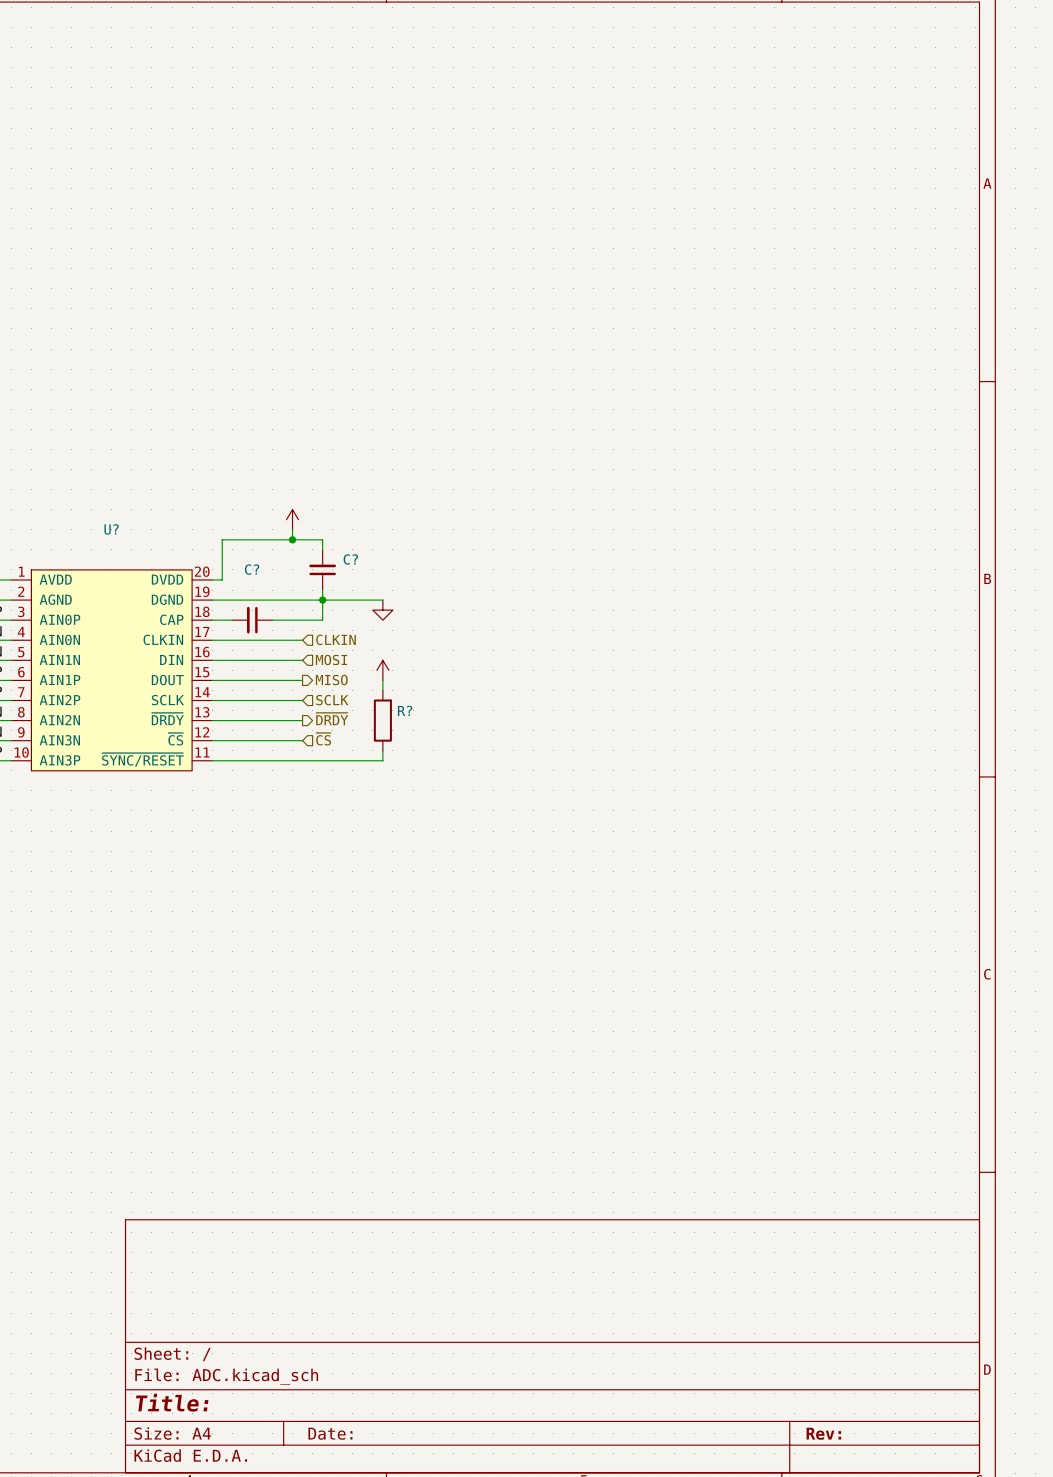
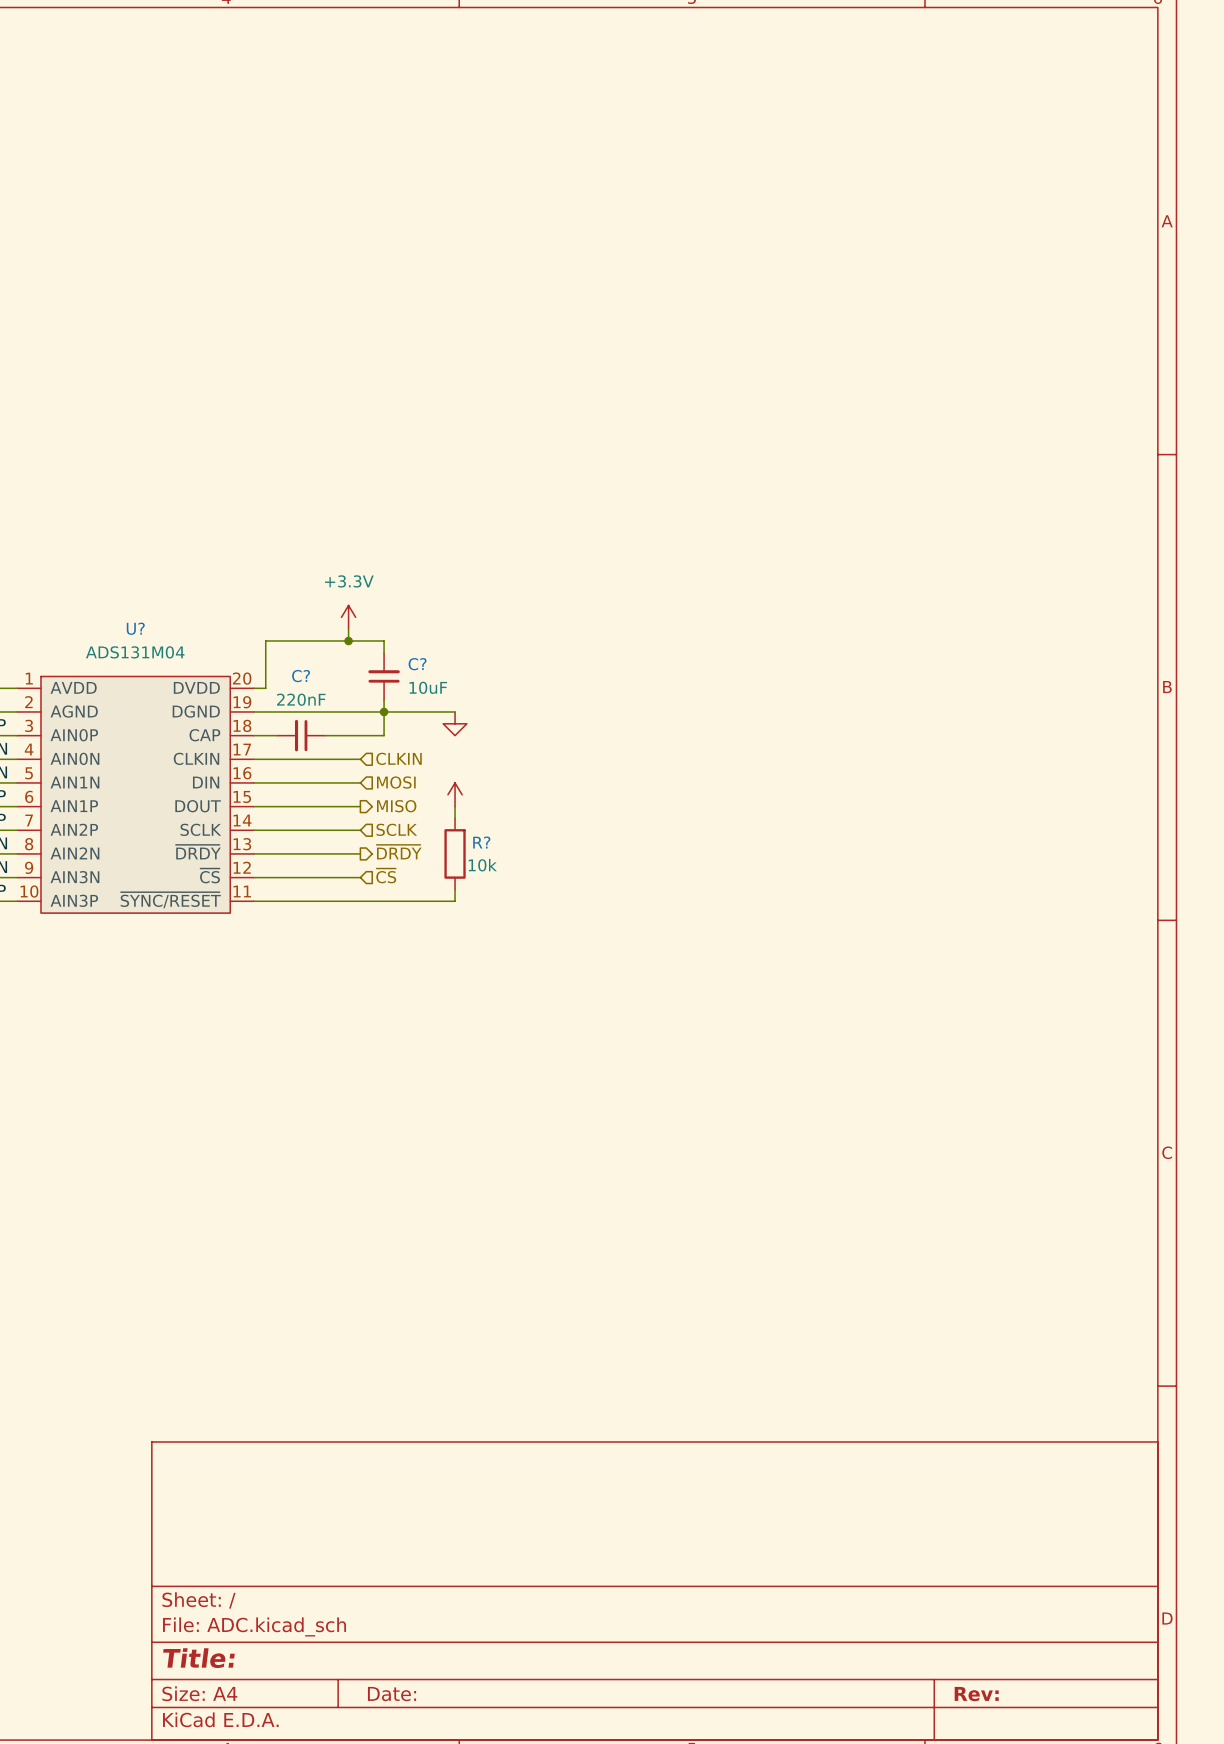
power symbol text: none -> +3.3V (349, 581)
U? value: none -> ADS131M04 (135, 652)
C? value: none -> 10uF (428, 687)
C? value: none -> 220nF (301, 699)
R? value: none -> 10k (482, 865)

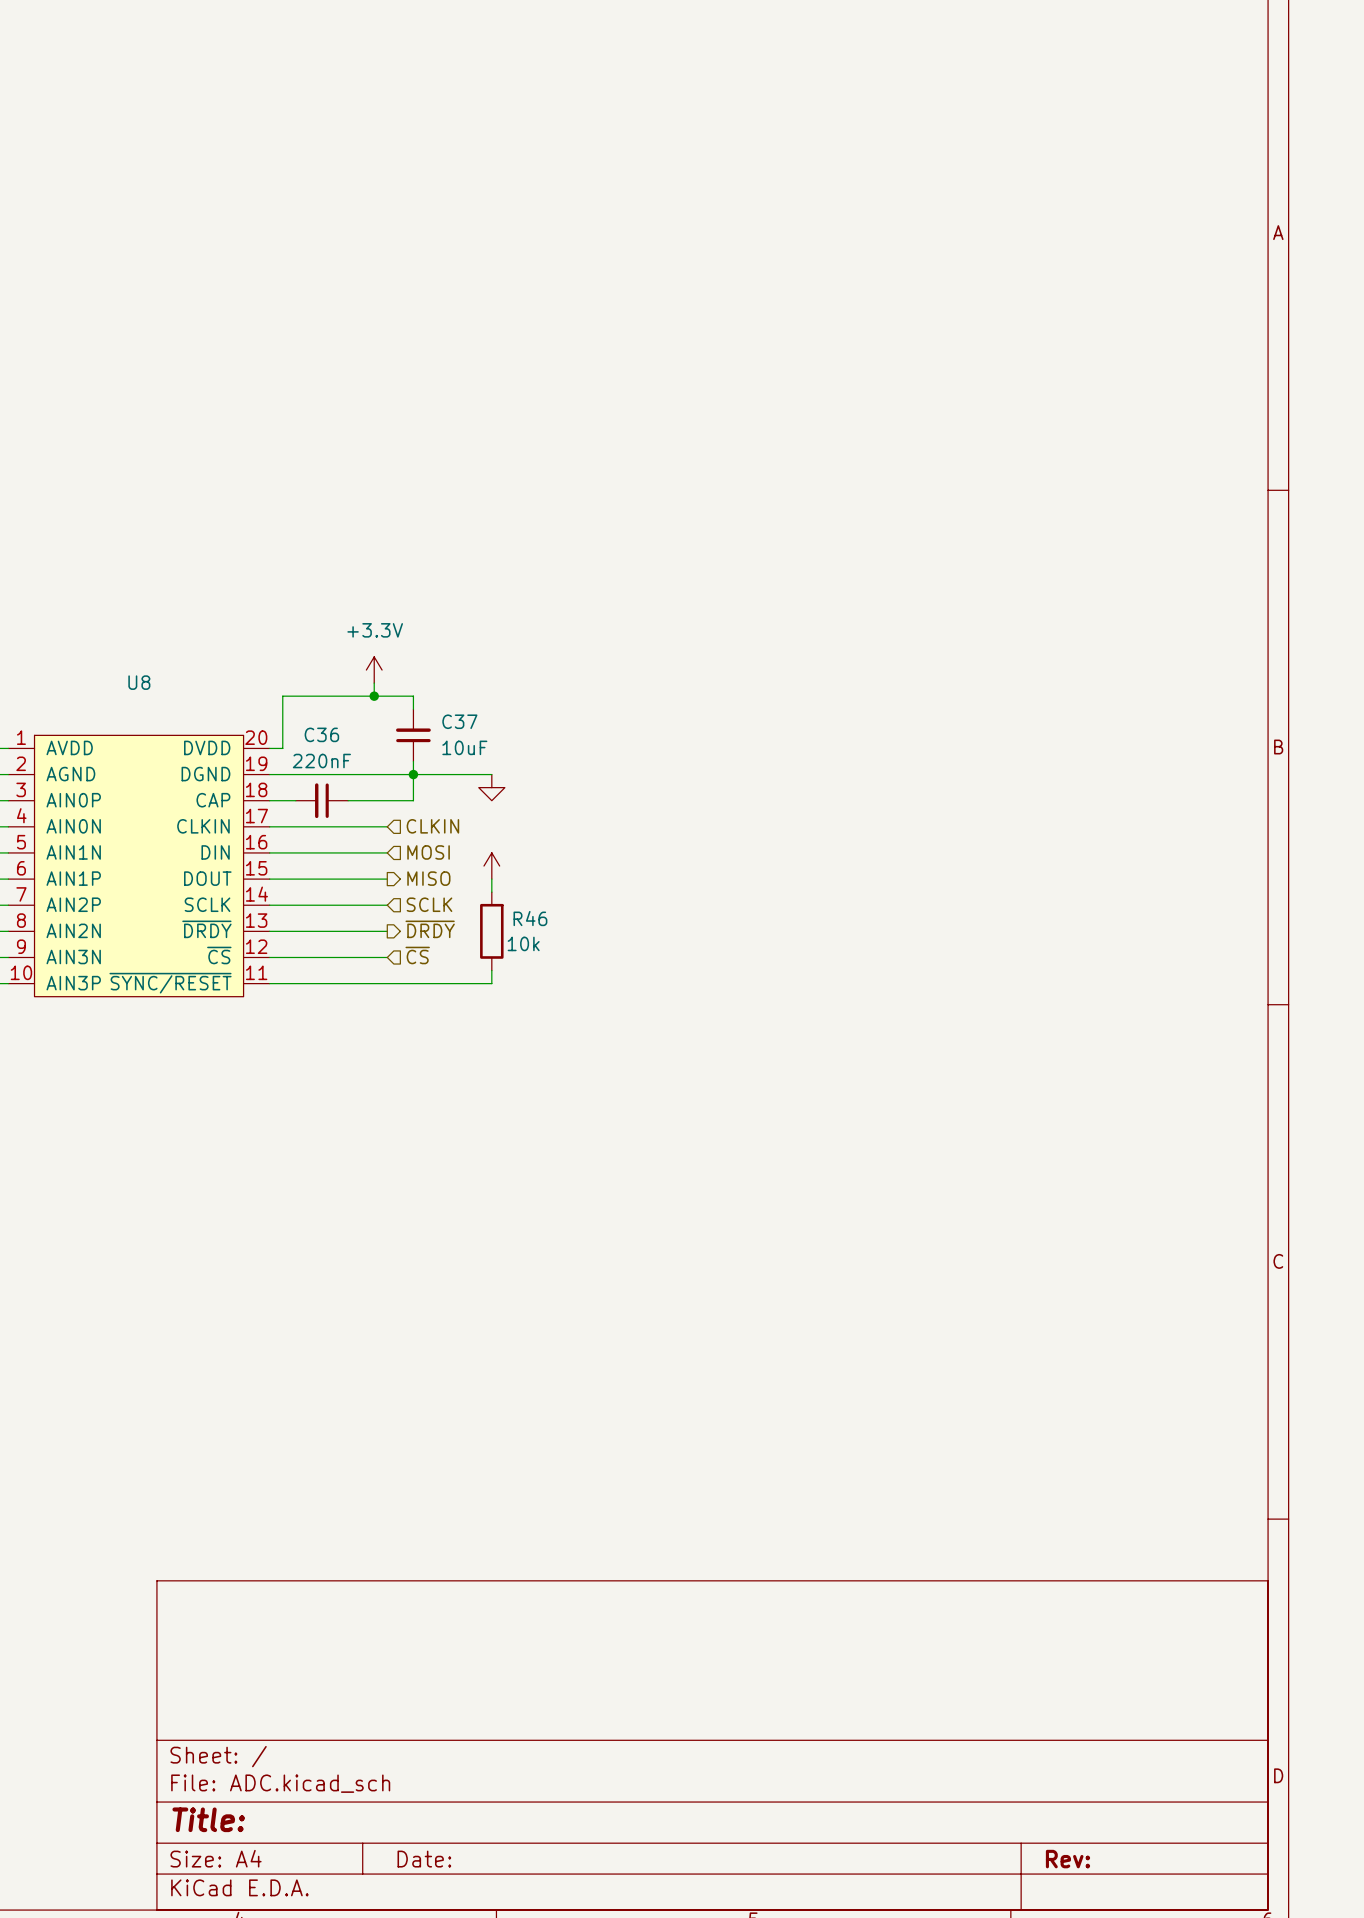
U? name: U? (135, 628) -> U8 (139, 682)
U? value: ADS131M04 (135, 652) -> none
C? name: C? (417, 664) -> C37 (459, 721)
C? name: C? (301, 676) -> C36 (321, 734)
R? name: R? (481, 842) -> R46 (530, 918)

